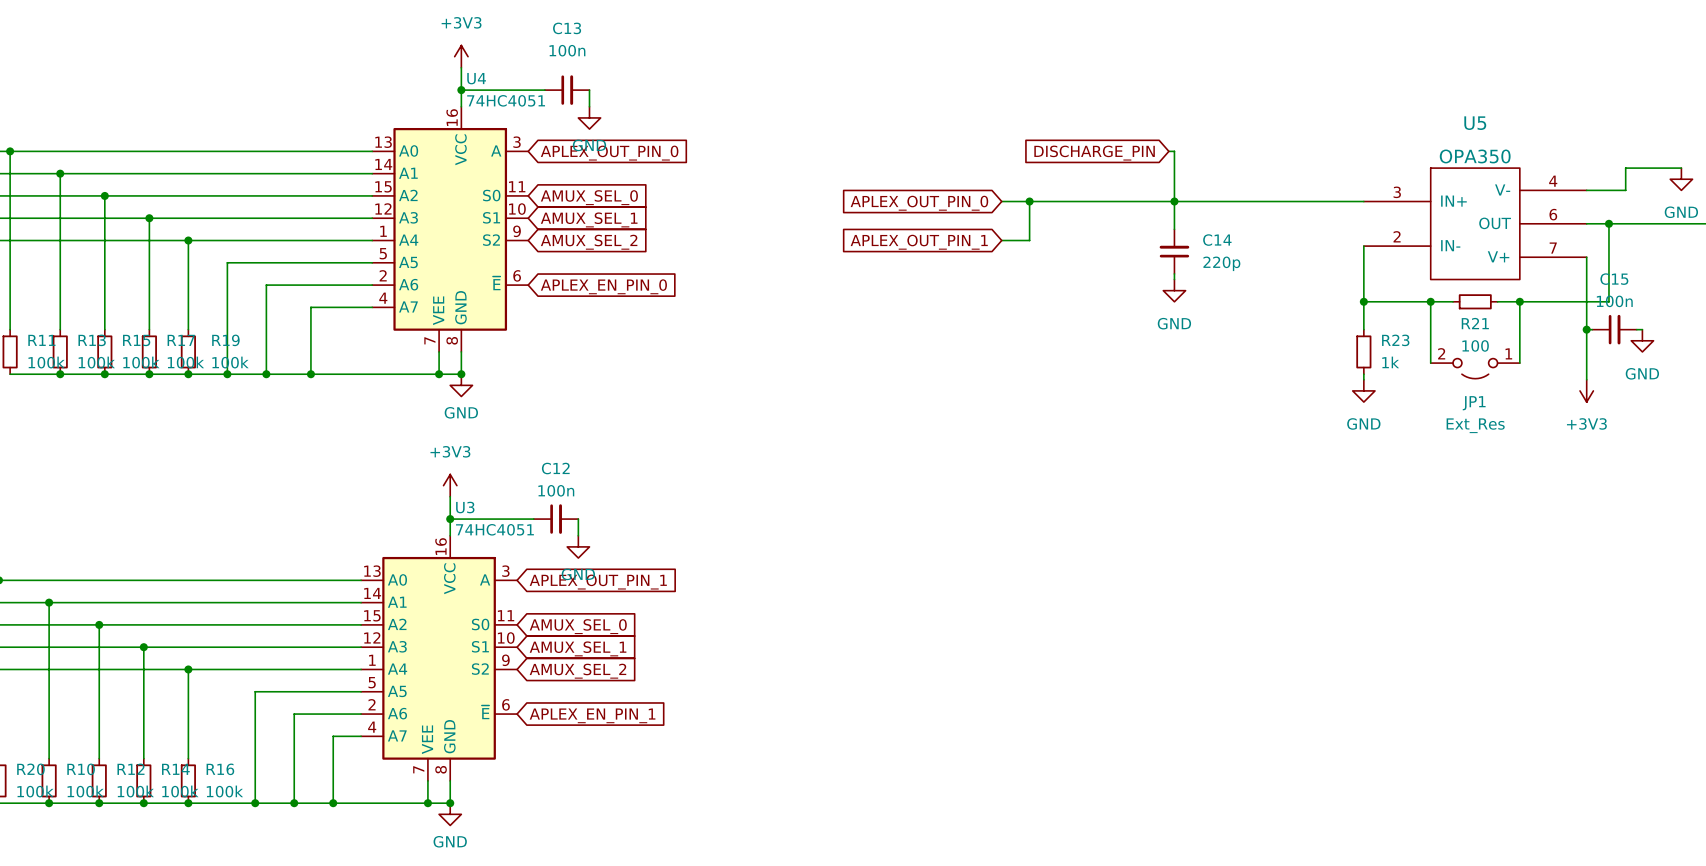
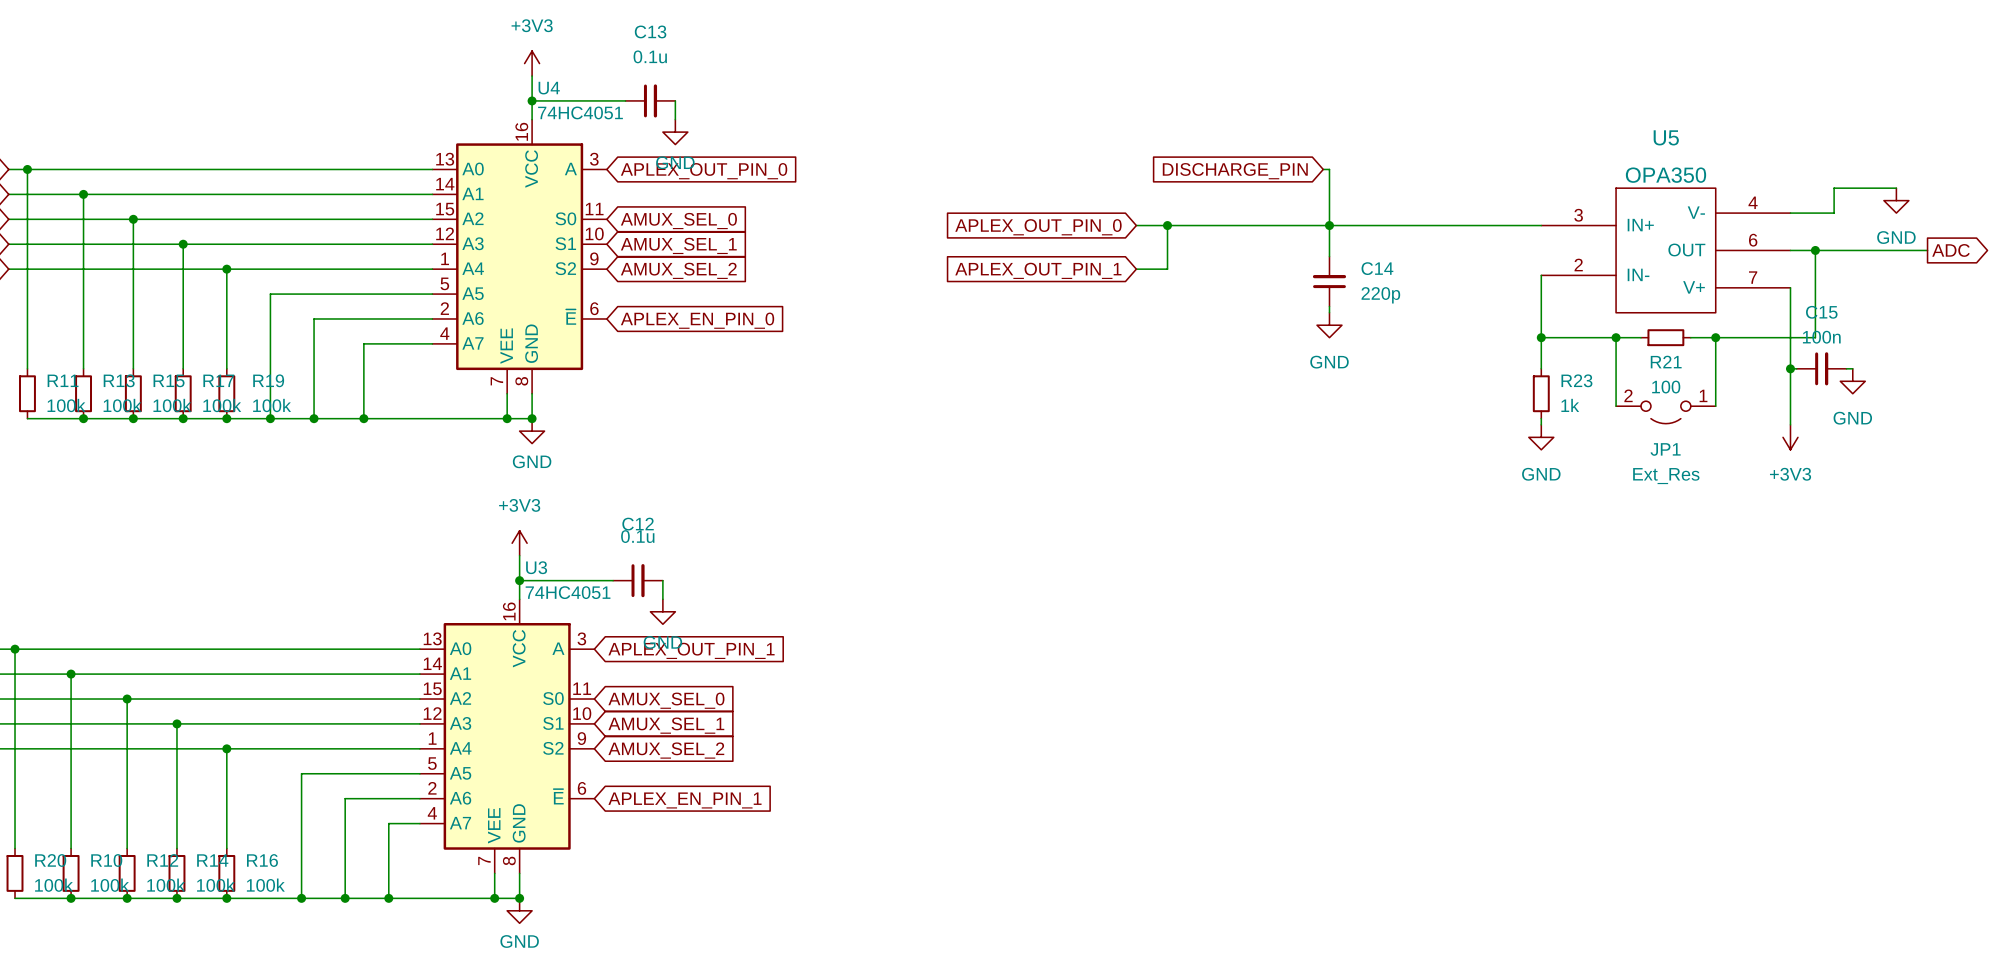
C13 value: 100n (567, 50) -> 0.1u (650, 56)
C12 value: 100n (556, 490) -> 0.1u (637, 536)

